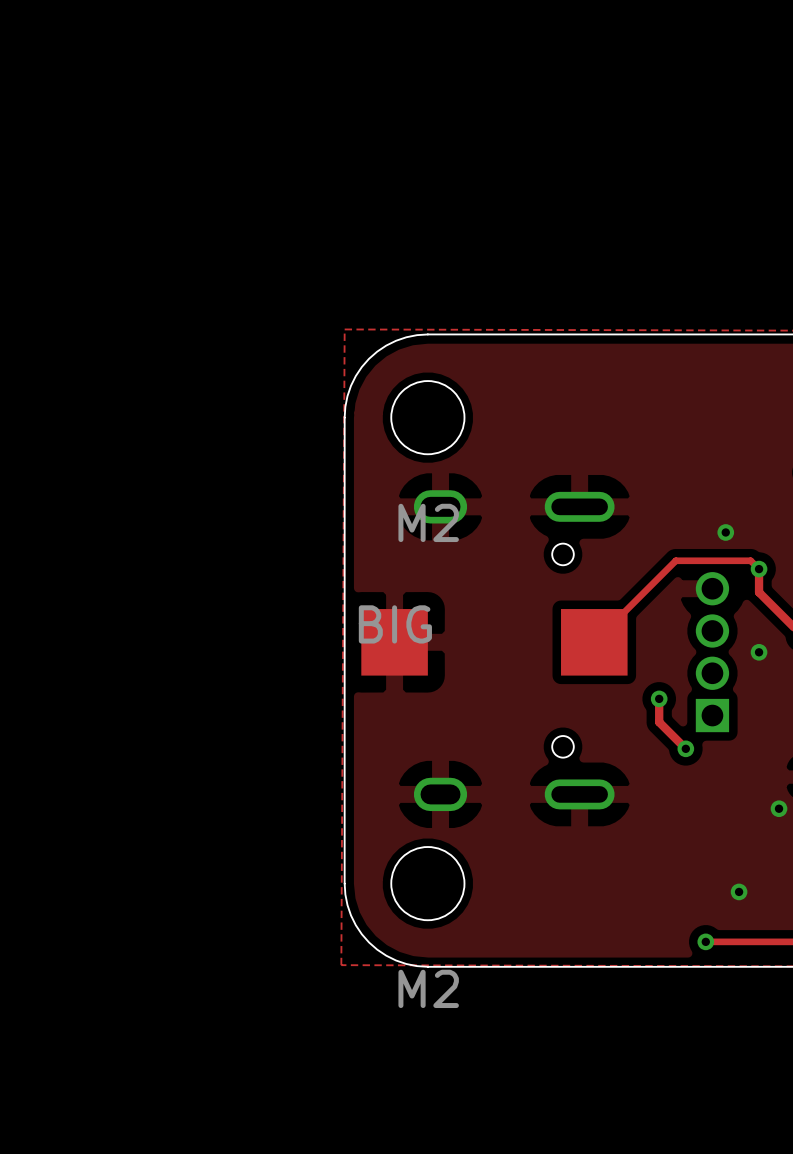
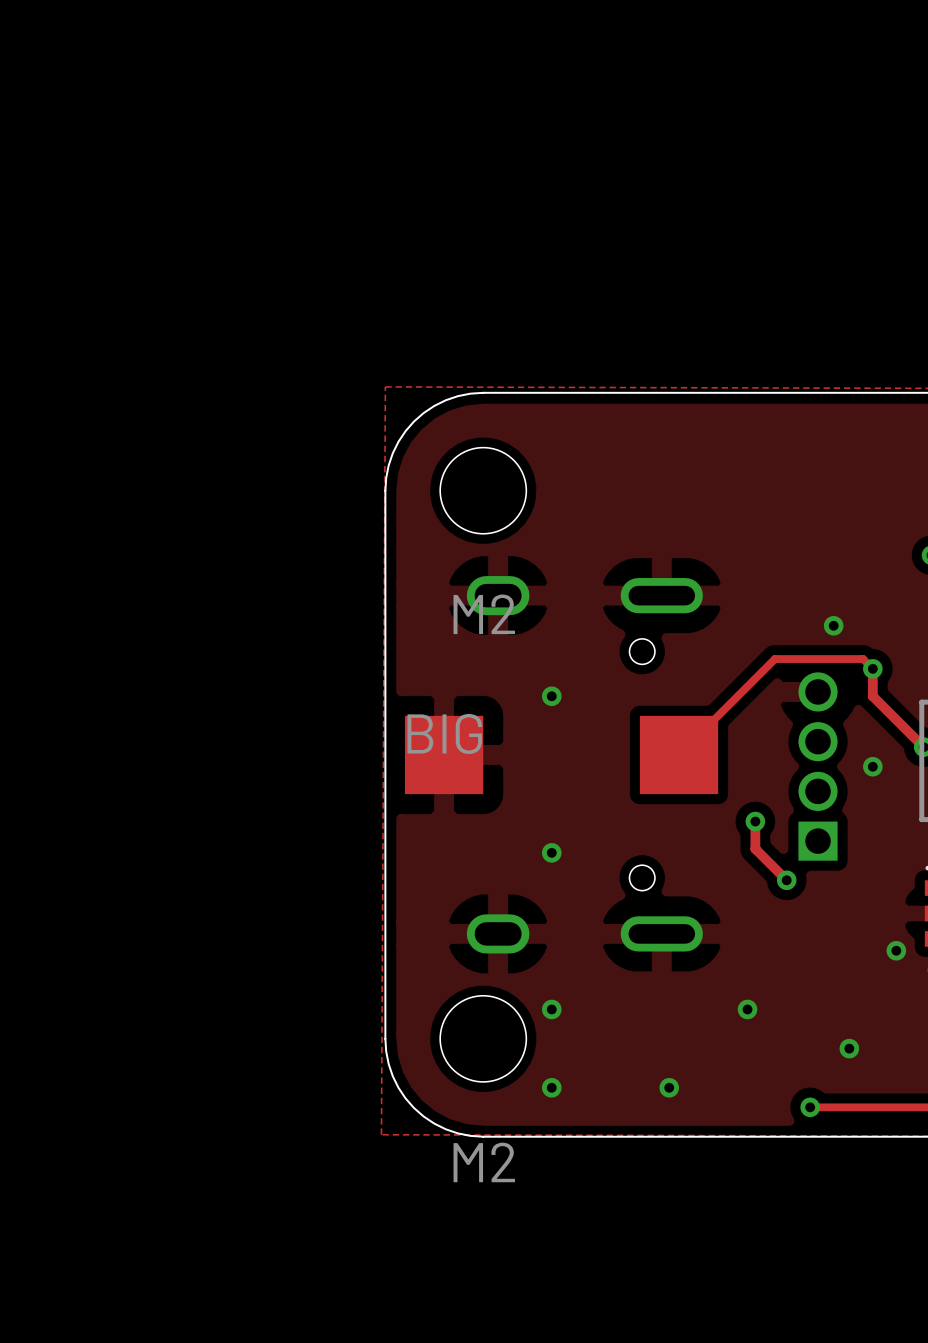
via: none -> (551, 696)
via: none -> (551, 852)
via: none -> (551, 1009)
via: none -> (747, 1009)
via: none -> (551, 1087)
via: none -> (669, 1087)

